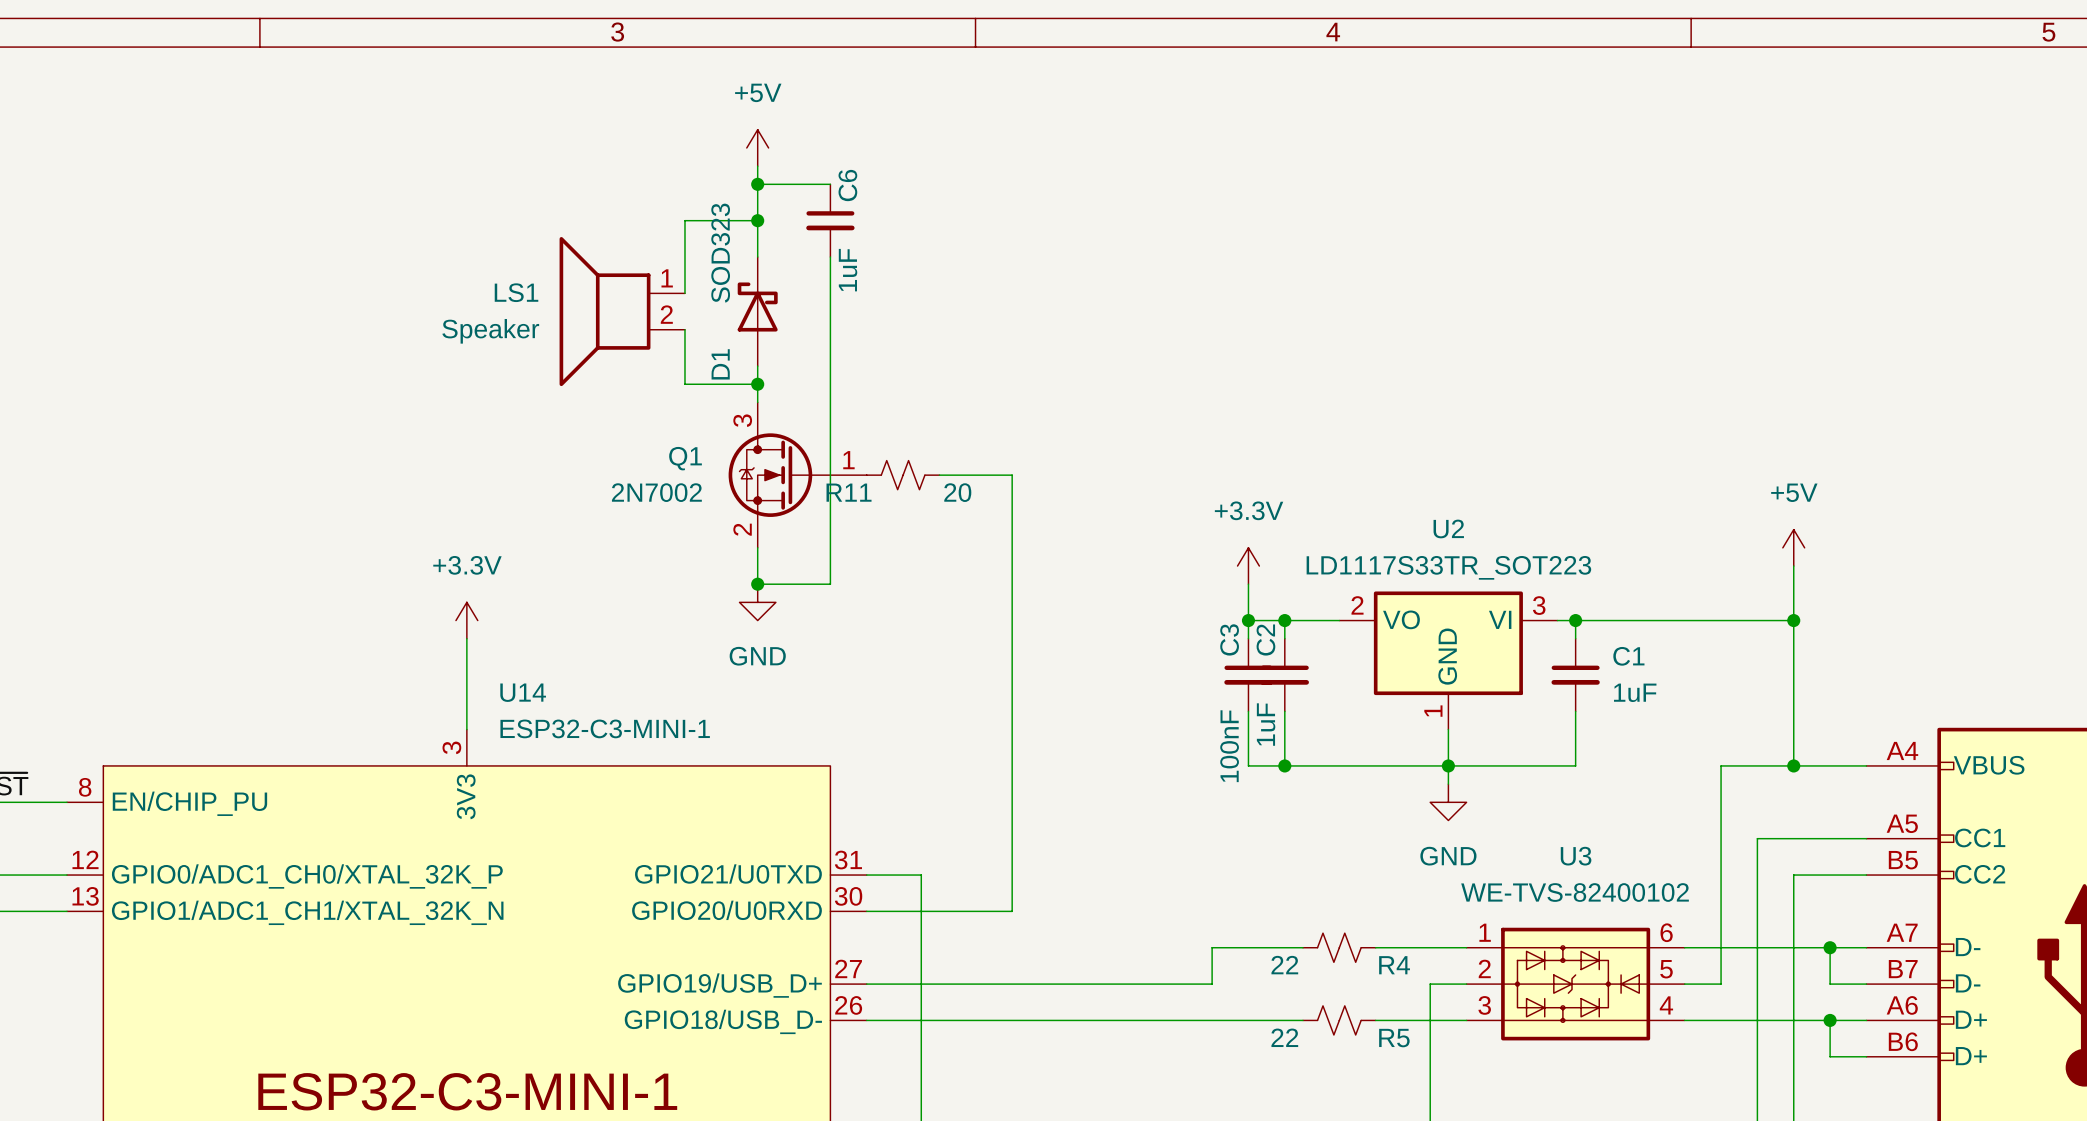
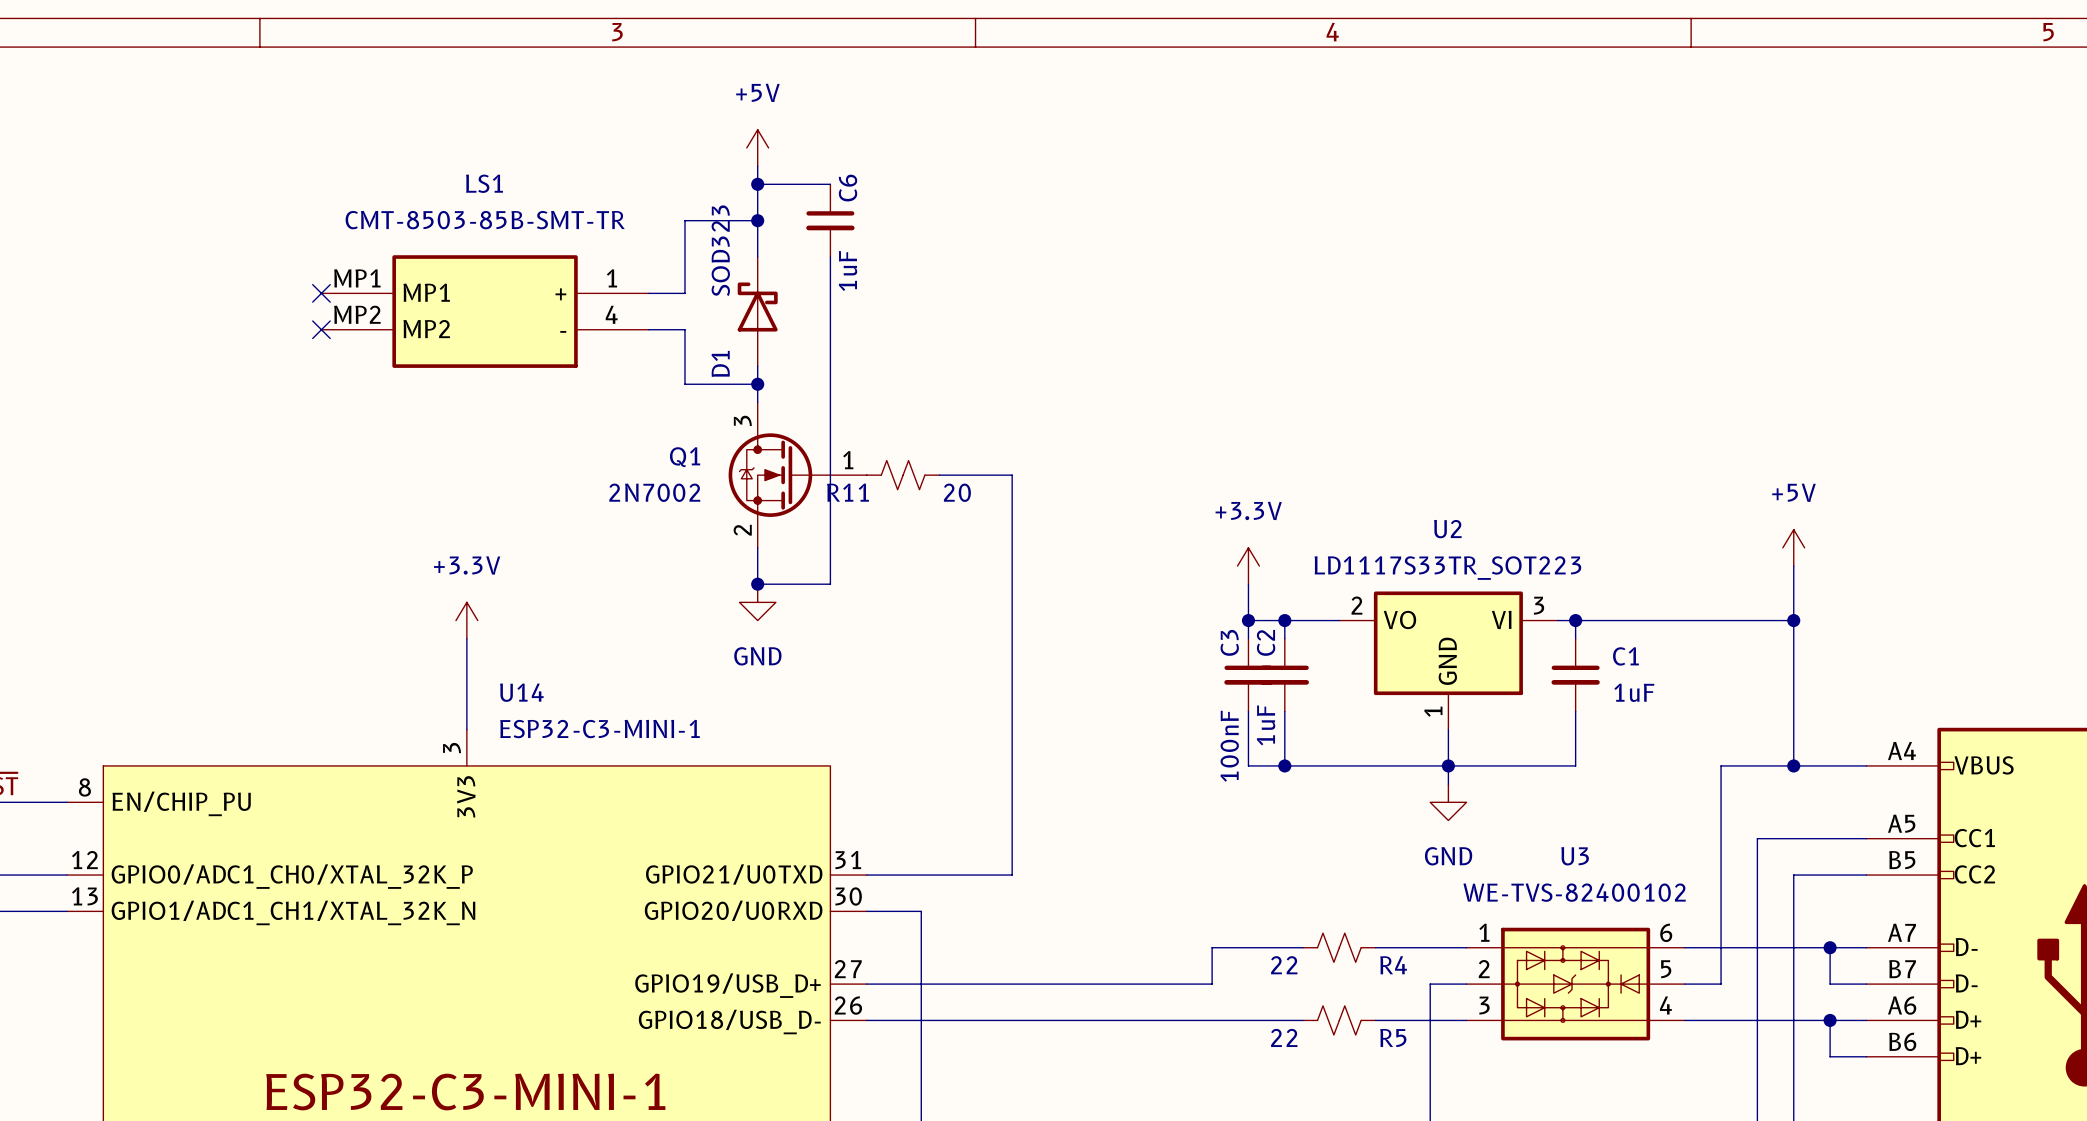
LS1 symbol: [559, 237, 685, 387] -> [321, 255, 649, 368]
LS1 name position: LS1 (516, 292) -> LS1 (484, 183)
no-connect mark: none -> (321, 293)
no-connect mark: none -> (321, 329)
LS1 value: Speaker (490, 331) -> CMT-8503-85B-SMT-TR (485, 220)
wire: (921, 875) (921, 911) (1012, 911) (1012, 875) -> (921, 875) (1012, 875)

